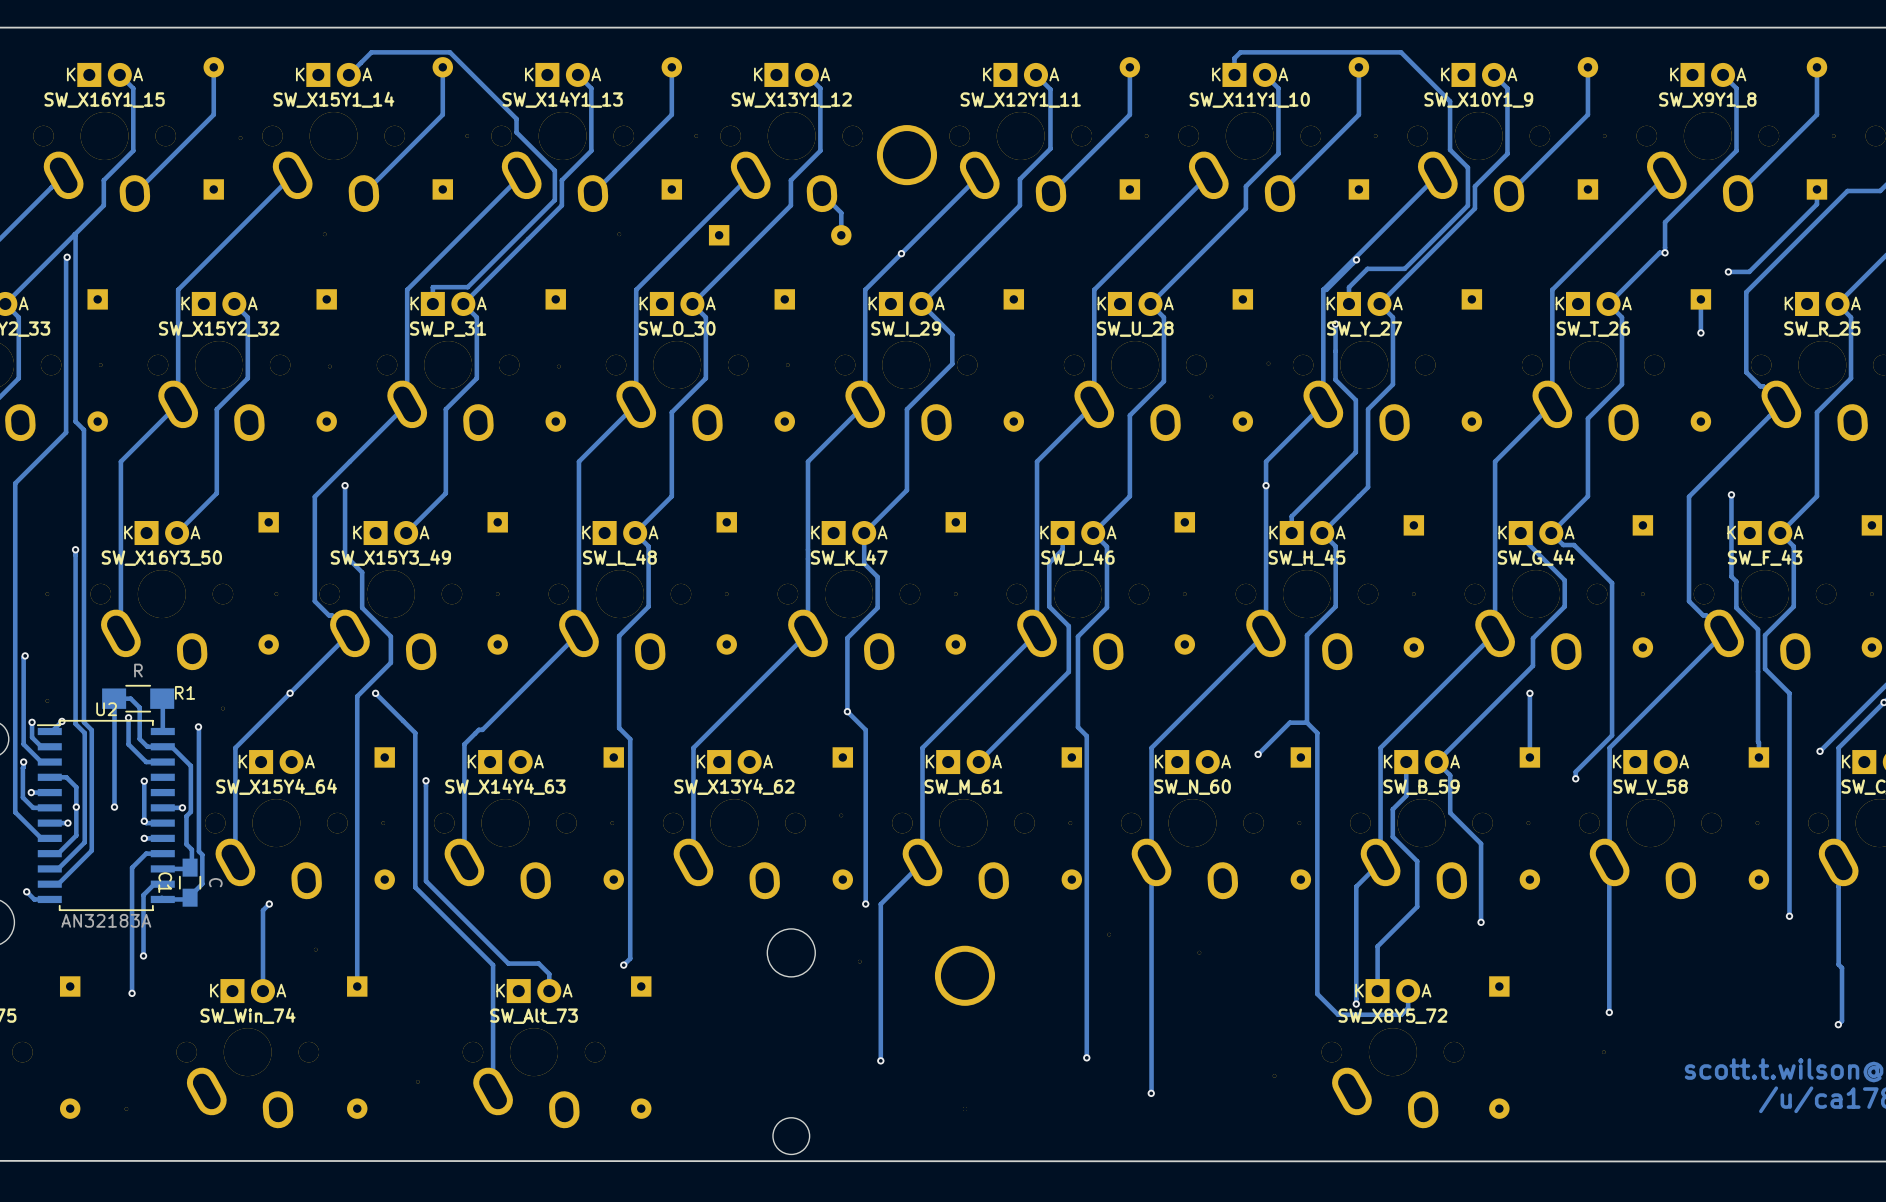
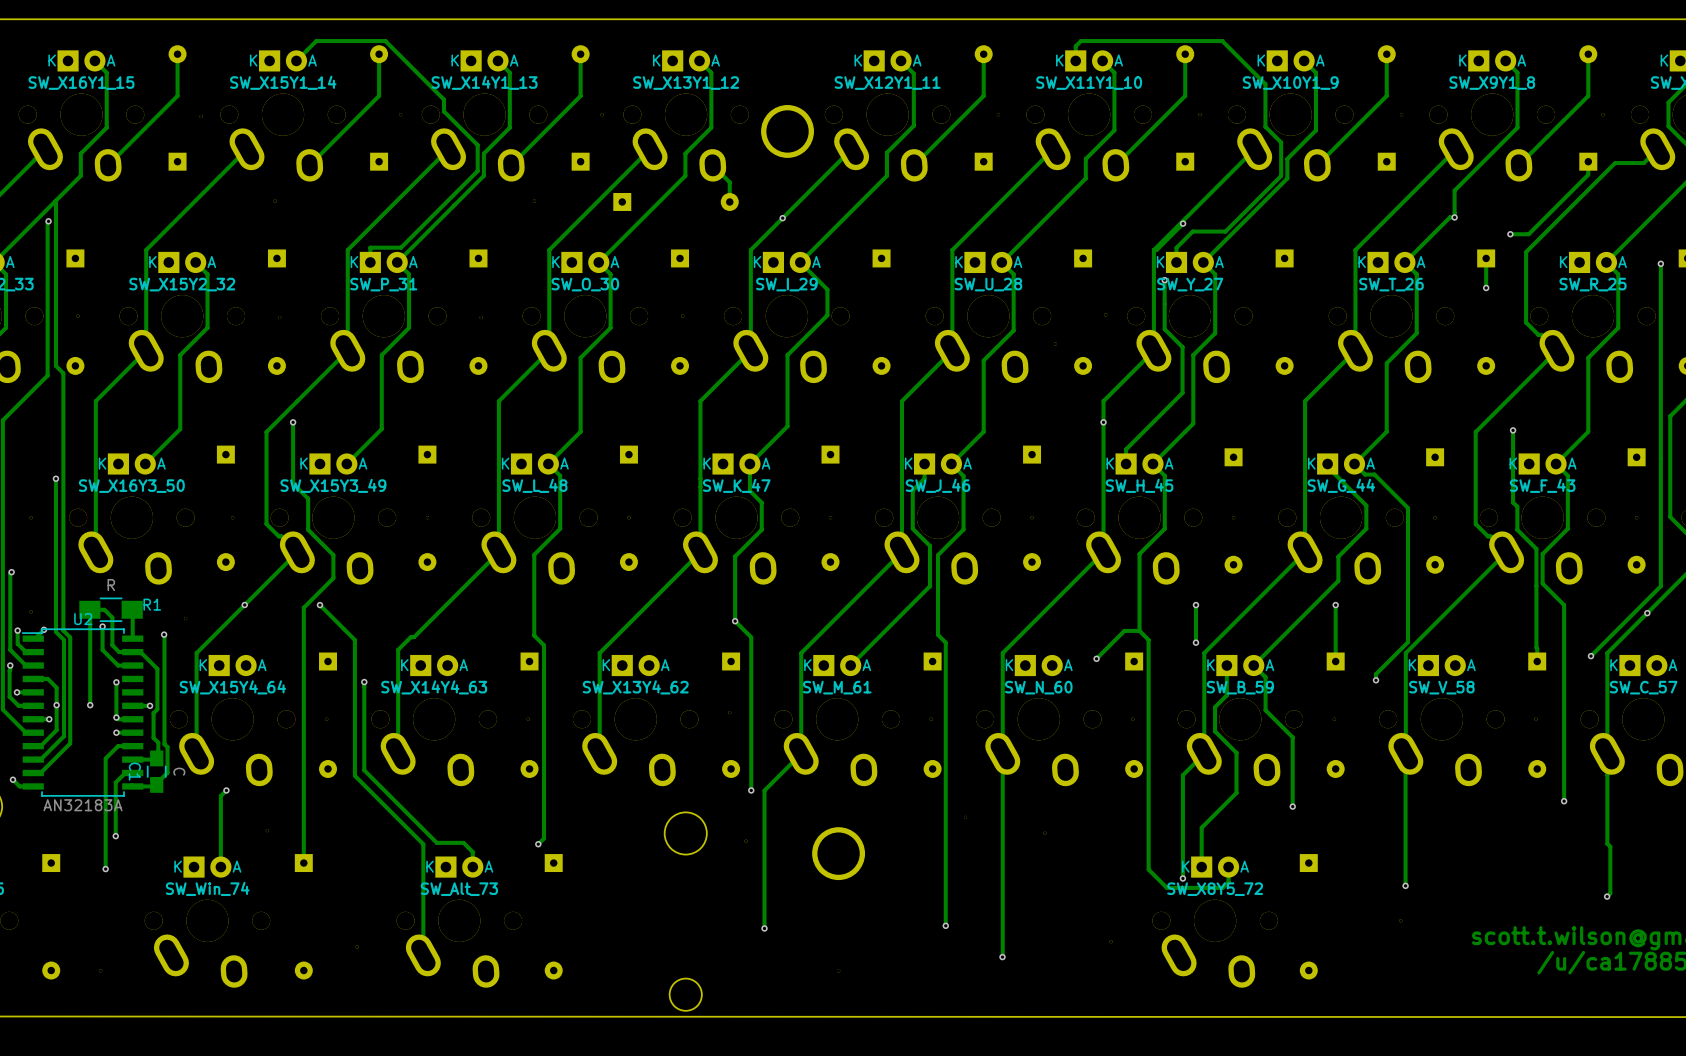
track: none -> (1195, 605) (1195, 642)
via: none -> (1195, 605)
via: none -> (1195, 642)

